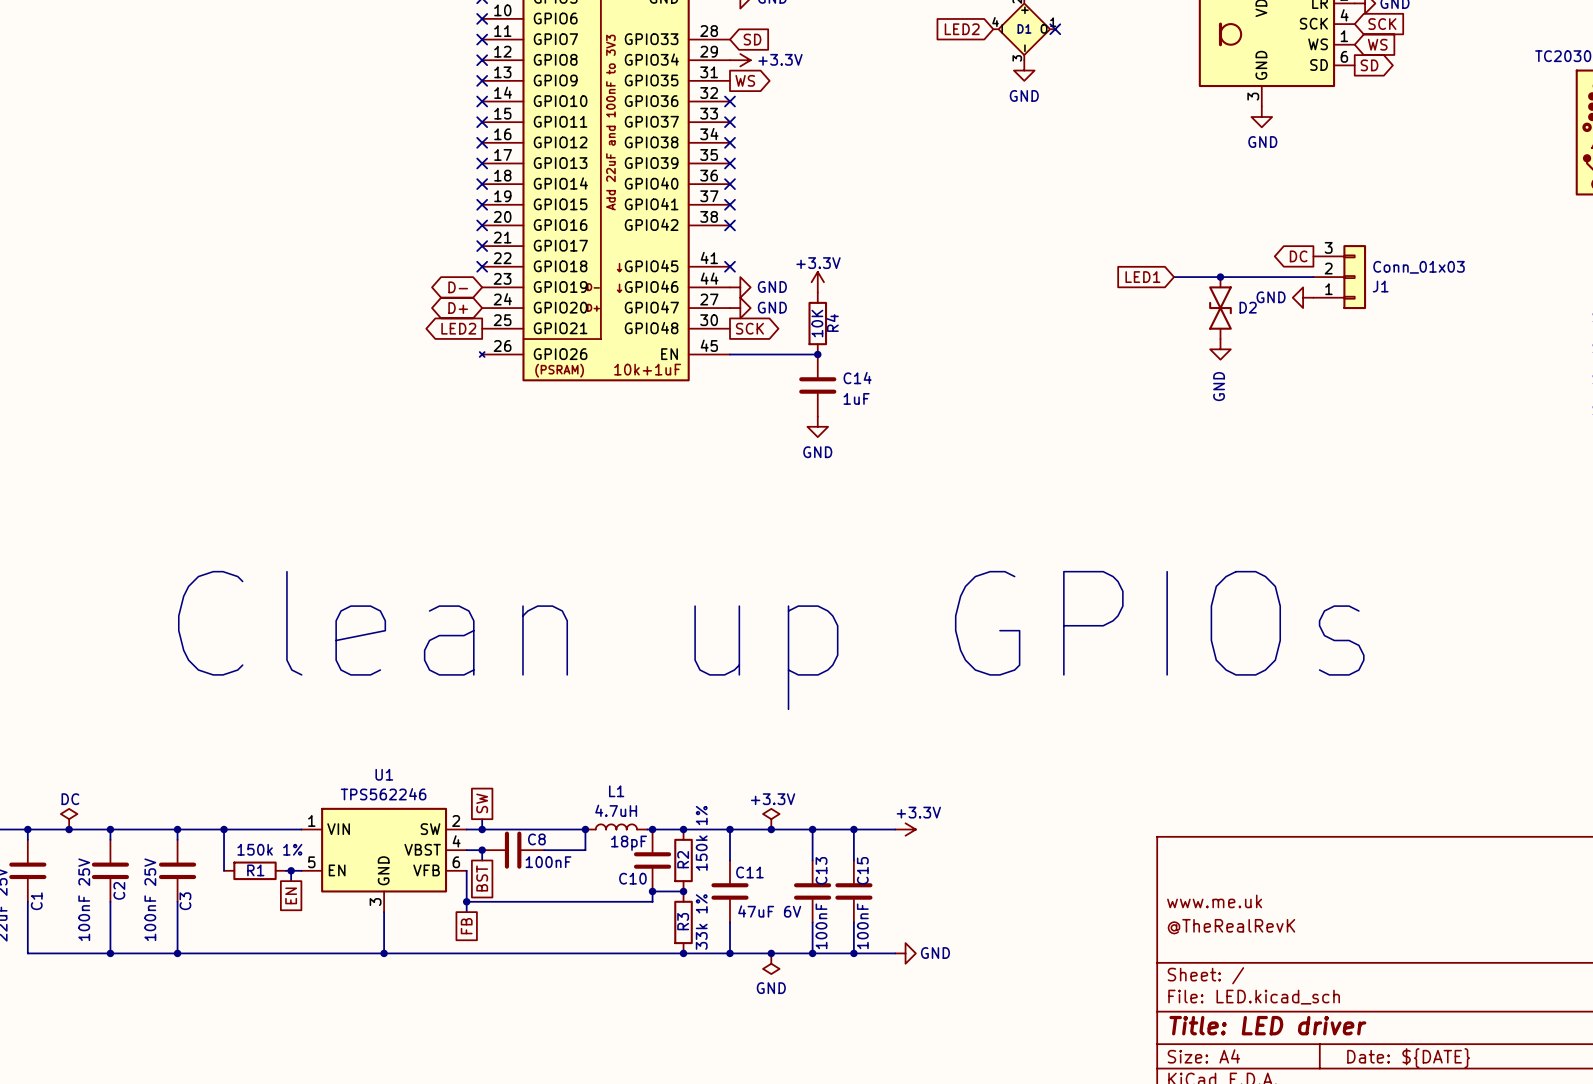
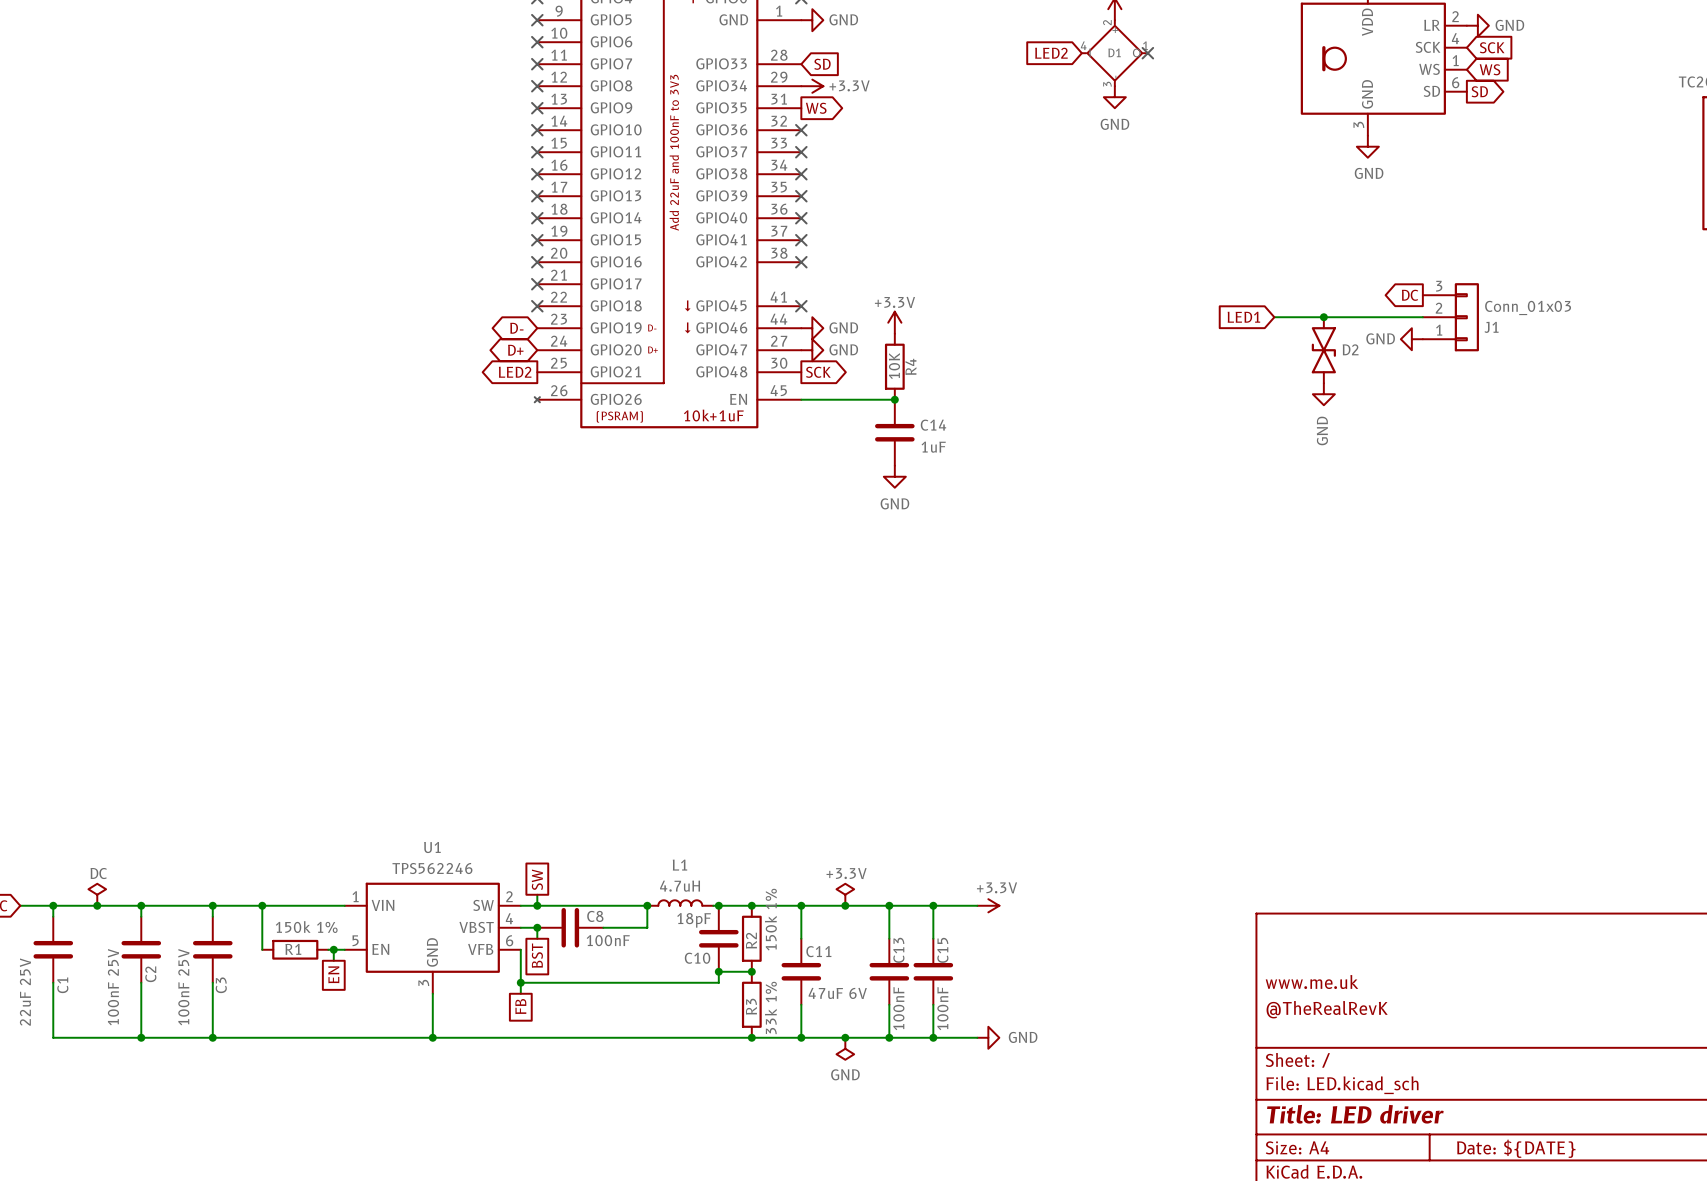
text: Clean up GPIOs (771, 640) -> none

